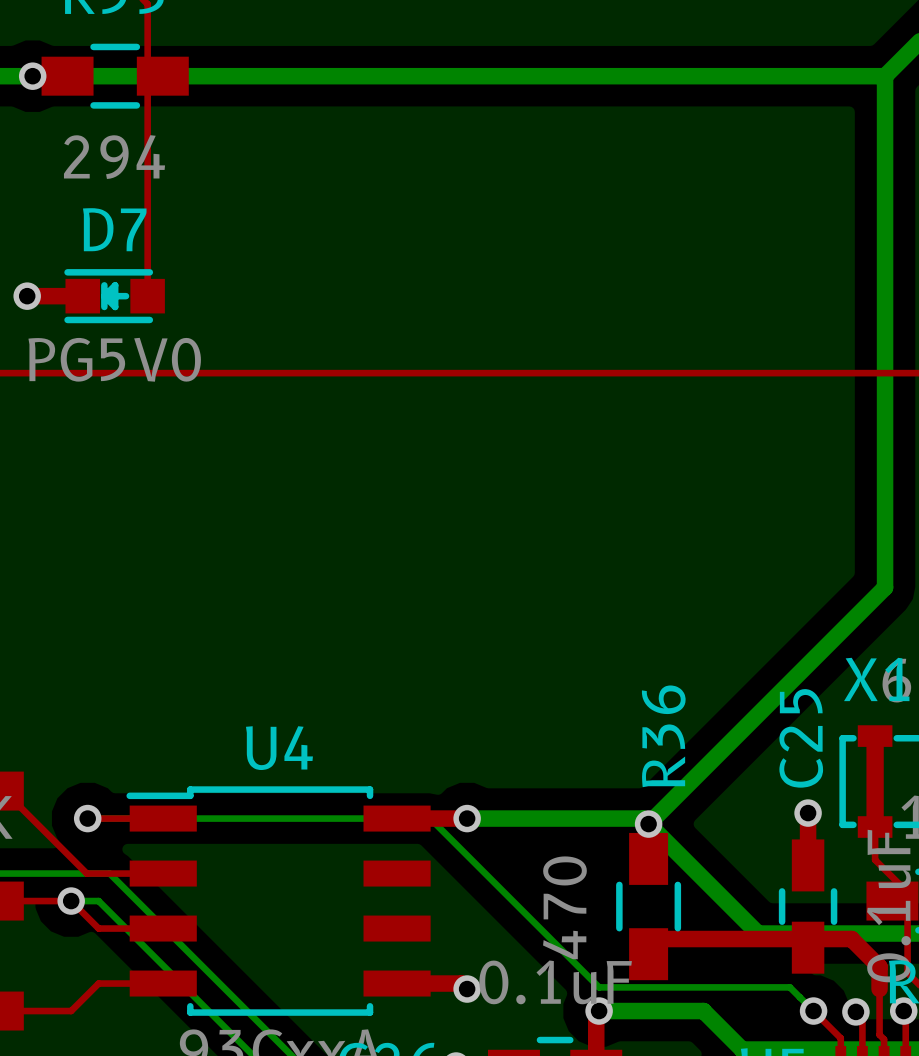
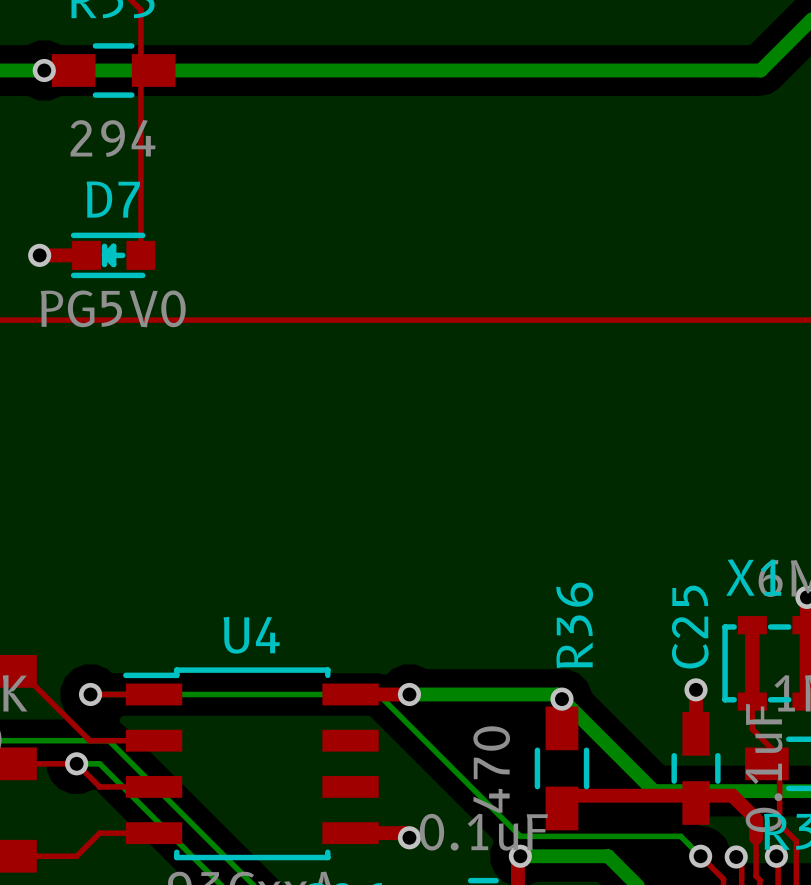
bottom track: (885, 76) (885, 587) (648, 824) -> none

